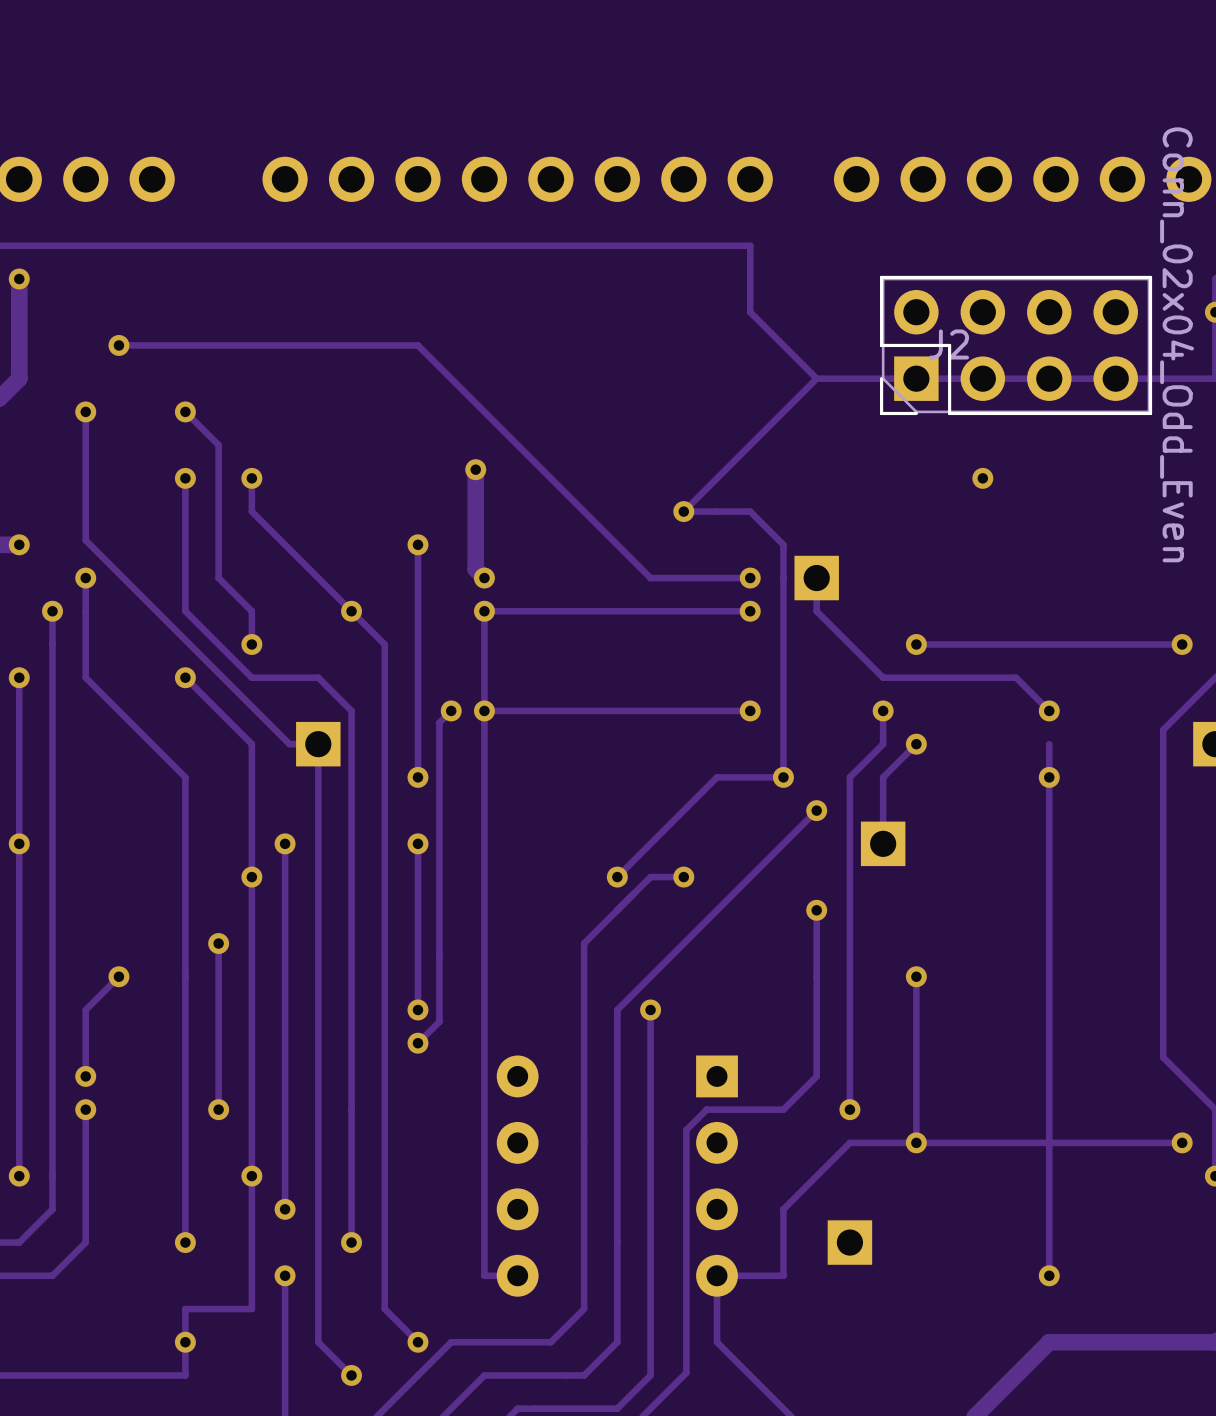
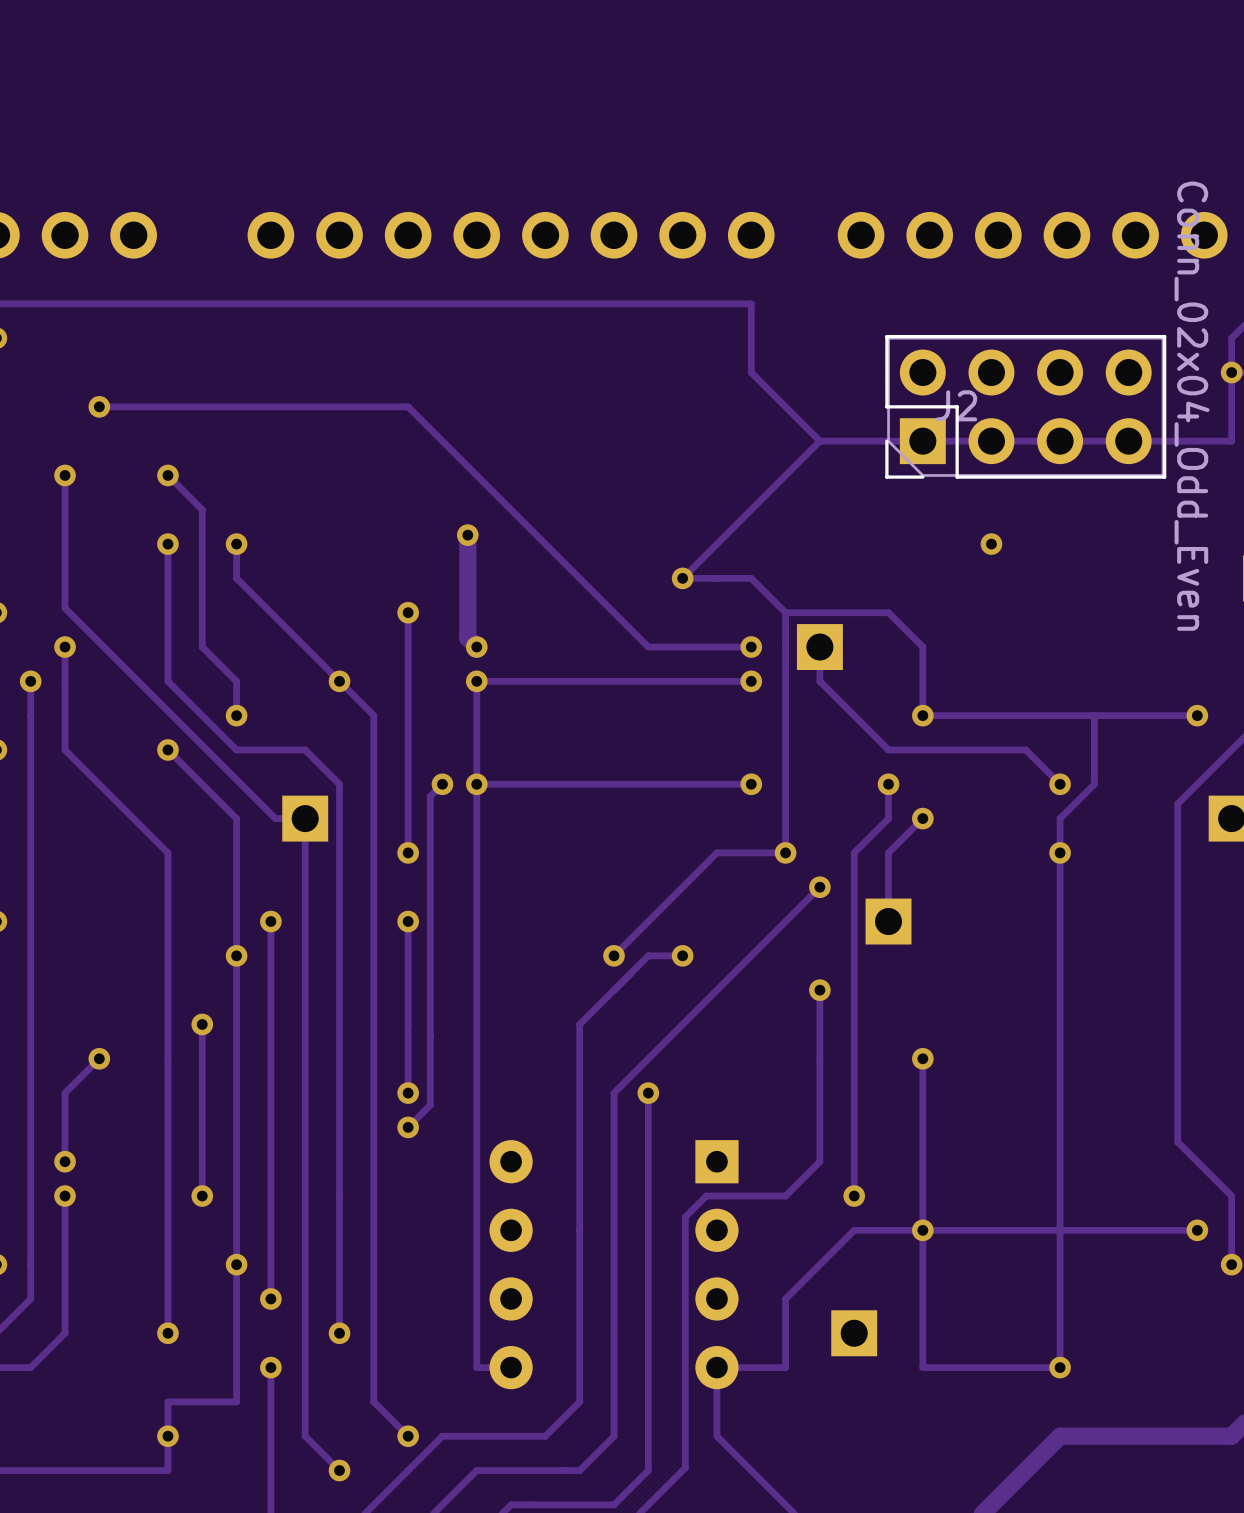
track: none -> (785, 612) (888, 612) (922, 647) (922, 715)
track: none -> (1094, 715) (1094, 784) (1060, 818)
track: none -> (922, 1230) (922, 1367) (1060, 1367)

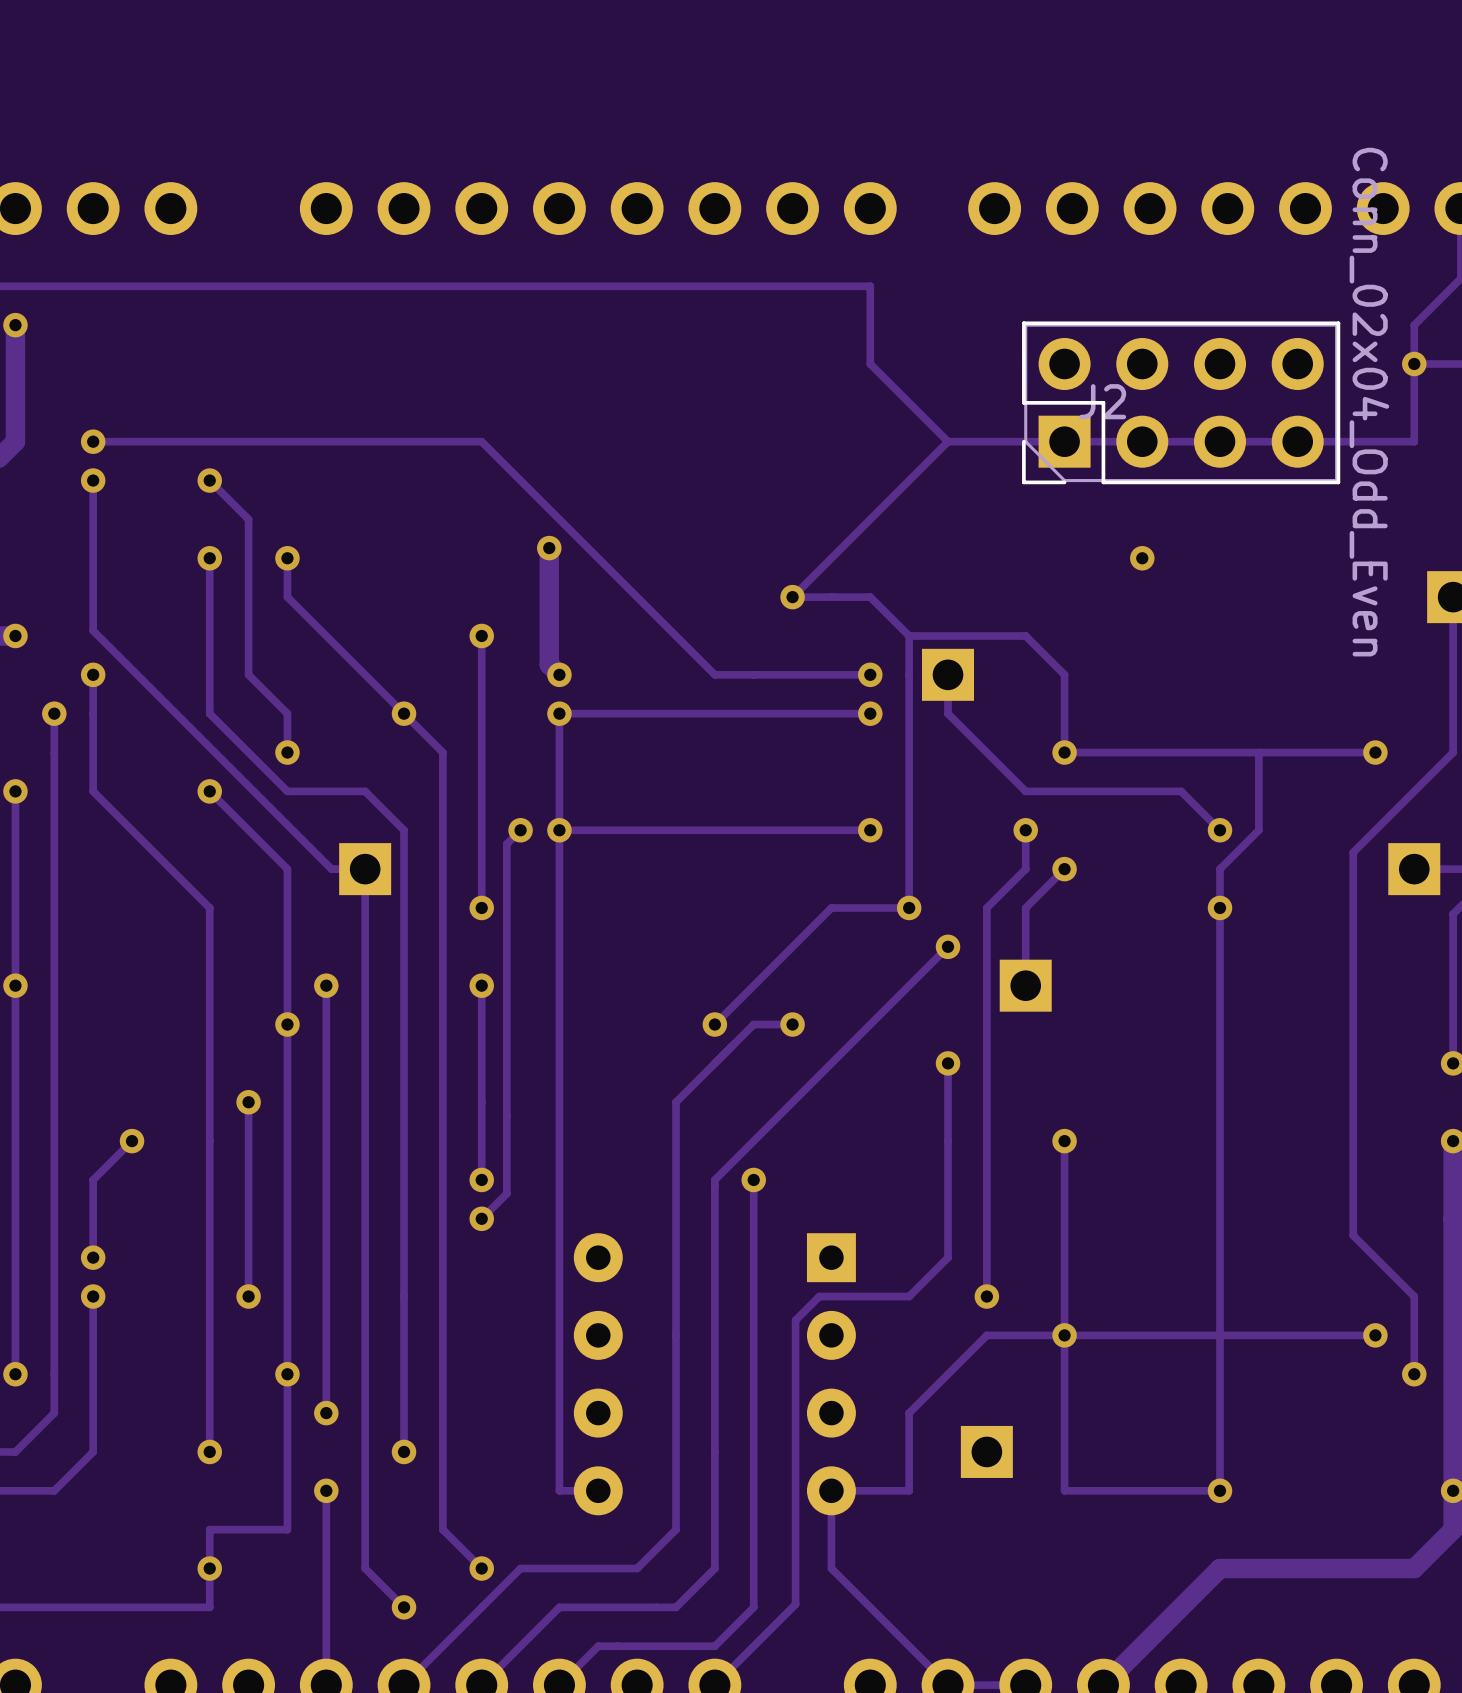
track: (99, 406) (408, 406) (648, 647) -> (93, 441) (481, 441) (714, 674) (753, 674)
via position: (99, 406) -> (93, 441)

